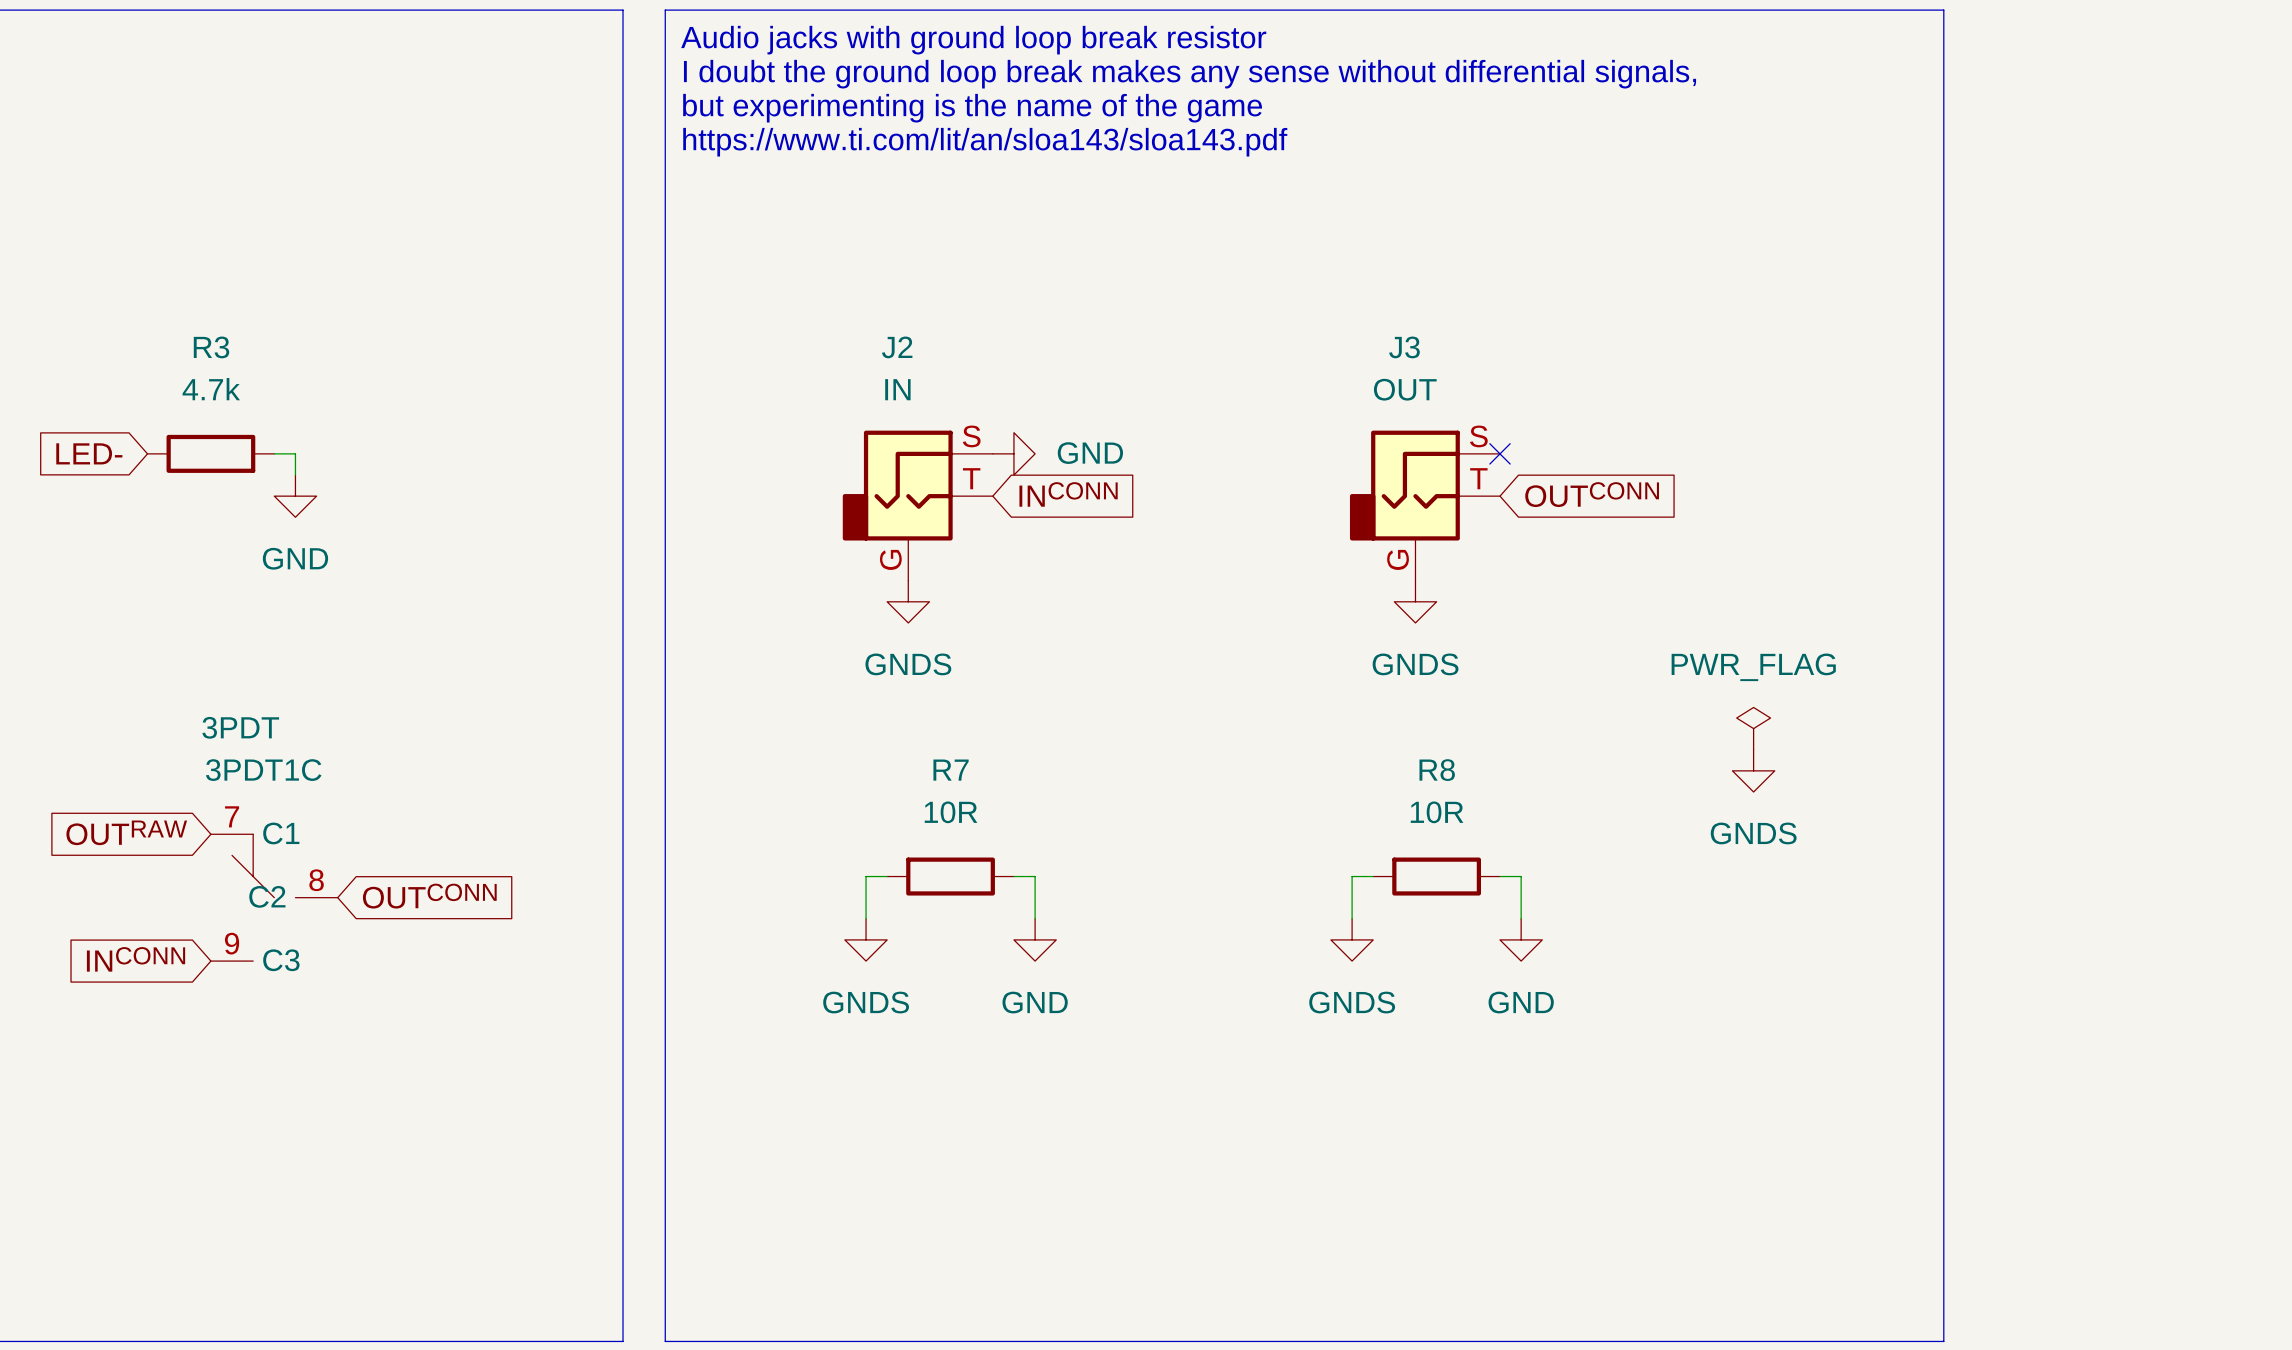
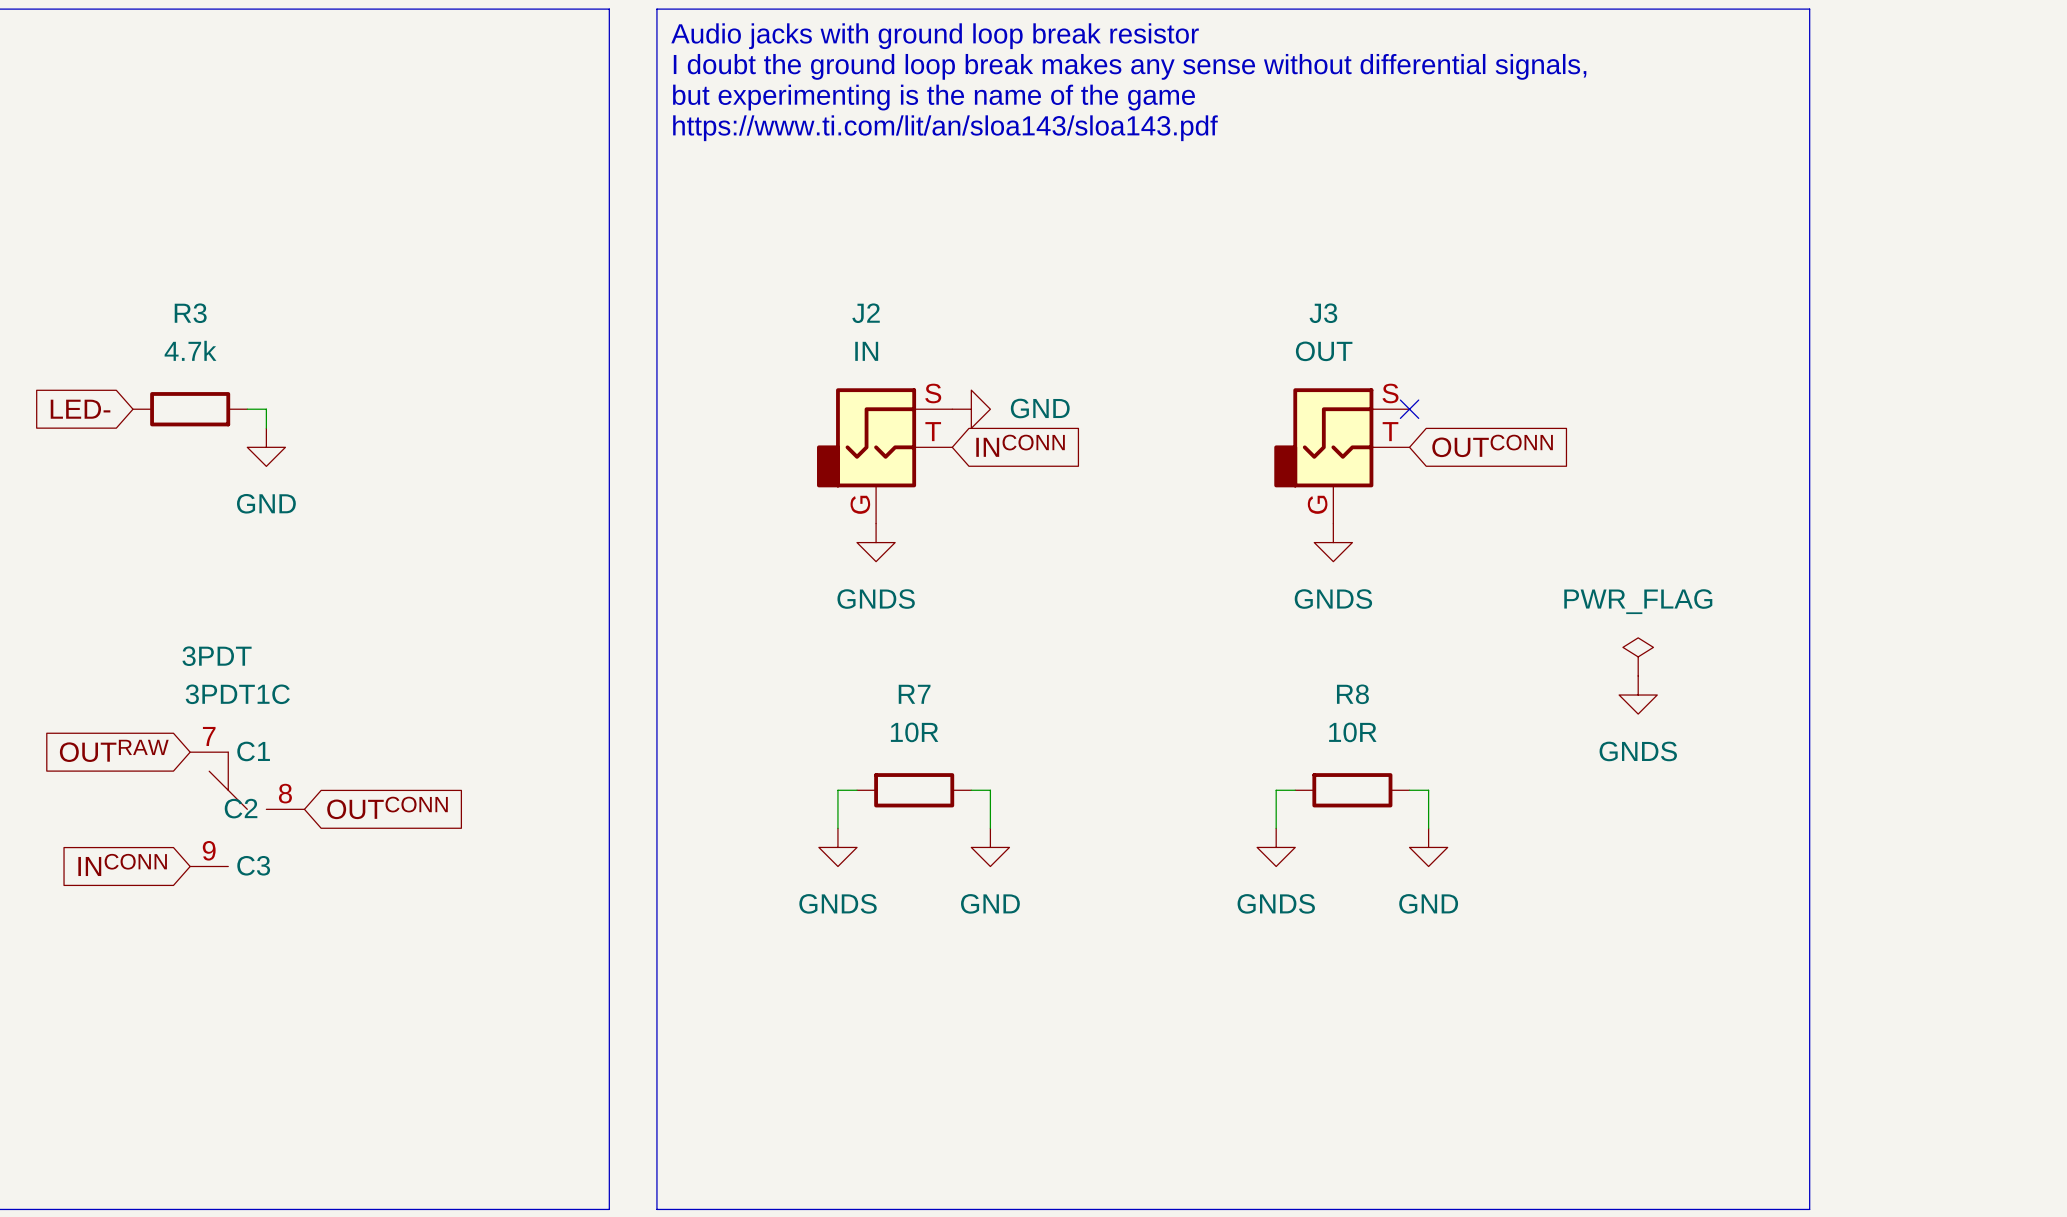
line: (623, 10) (623, 1341) -> (561, 9) (599, 9)
line: (665, 10) (665, 1341) -> (561, 1209) (599, 1209)
line: (675, 10) (728, 10) -> (609, 9) (609, 1209)
line: (1943, 10) (1943, 1341) -> (1752, 9) (1809, 9) (1809, 1209) (1752, 1209)
text position: Audio jacks with ground loop break resistor (973, 40) -> Audio jacks with ground loop break resistor (935, 36)
text position: I doubt the ground loop break makes any sense without differential signals, (1190, 74) -> I doubt the ground loop break makes any sense without differential signals, (1130, 66)
text position: but experimenting is the name of the game (972, 108) -> but experimenting is the name of the game (934, 97)
text position: https://www.ti.com/lit/an/sloa143/sloa143.pdf (985, 142) -> https://www.ti.com/lit/an/sloa143/sloa143.pdf (945, 128)
power symbol position: GND (1013, 453) -> GND (971, 409)
no-connect mark position: (1500, 453) -> (1409, 409)
global label position: INCONN (1068, 494) -> INCONN (1020, 445)
global label position: OUTCONN (1592, 494) -> OUTCONN (1492, 445)
J2 position: (917, 505) -> (884, 455)
J3 position: (1424, 505) -> (1341, 455)
power symbol position: GNDS (908, 601) -> GNDS (876, 542)
power symbol position: GNDS (1415, 601) -> GNDS (1333, 542)
power symbol position: PWR_FLAG (1753, 728) -> PWR_FLAG (1638, 656)
power symbol position: GNDS (1753, 770) -> GNDS (1638, 695)
wire: (887, 876) (866, 876) (866, 918) -> (857, 790) (837, 790) (837, 828)
R7 position: (950, 876) -> (914, 790)
wire: (1013, 876) (1035, 876) (1035, 918) -> (971, 790) (990, 790) (990, 828)
wire: (1373, 876) (1352, 876) (1352, 918) -> (1295, 790) (1276, 790) (1276, 828)
R8 position: (1436, 876) -> (1352, 790)
wire: (1500, 876) (1521, 876) (1521, 918) -> (1409, 790) (1428, 790) (1428, 828)
power symbol position: GNDS (866, 939) -> GNDS (837, 847)
power symbol position: GND (1035, 939) -> GND (990, 847)
power symbol position: GNDS (1352, 939) -> GNDS (1276, 847)
power symbol position: GND (1521, 939) -> GND (1428, 847)
line: (675, 1341) (728, 1341) -> (656, 9) (656, 1209)

